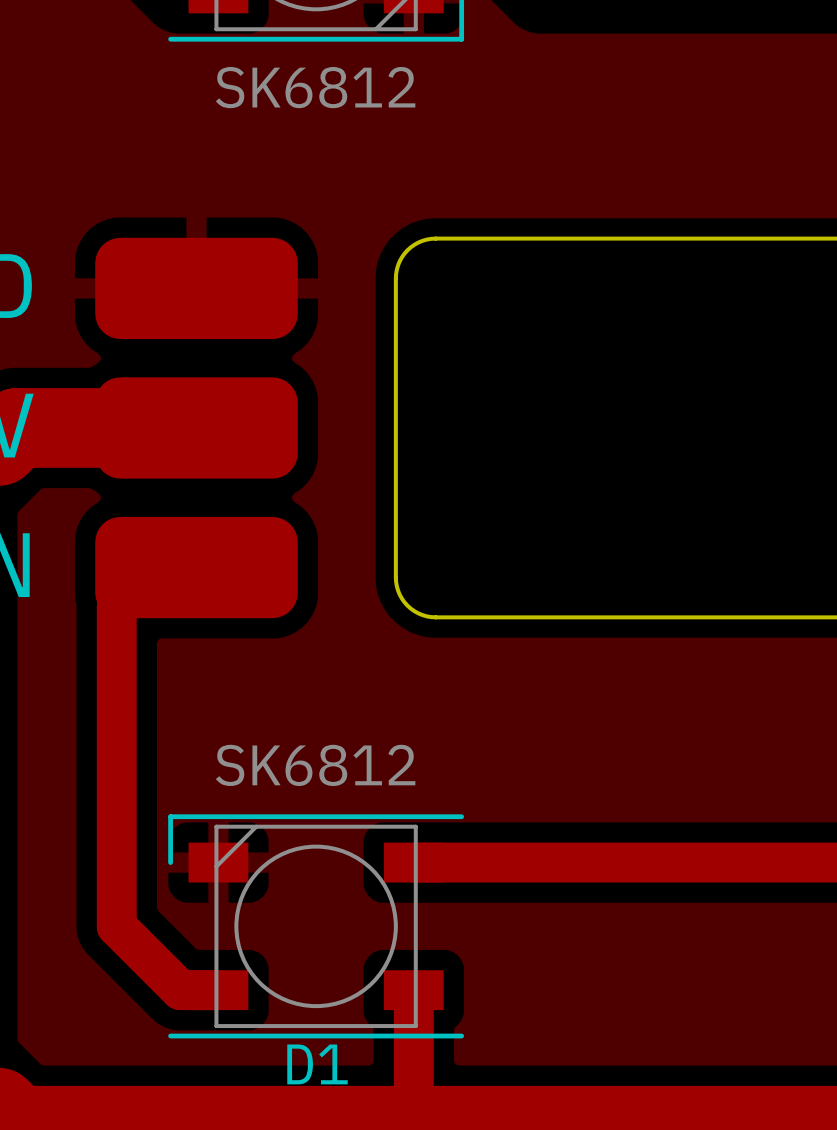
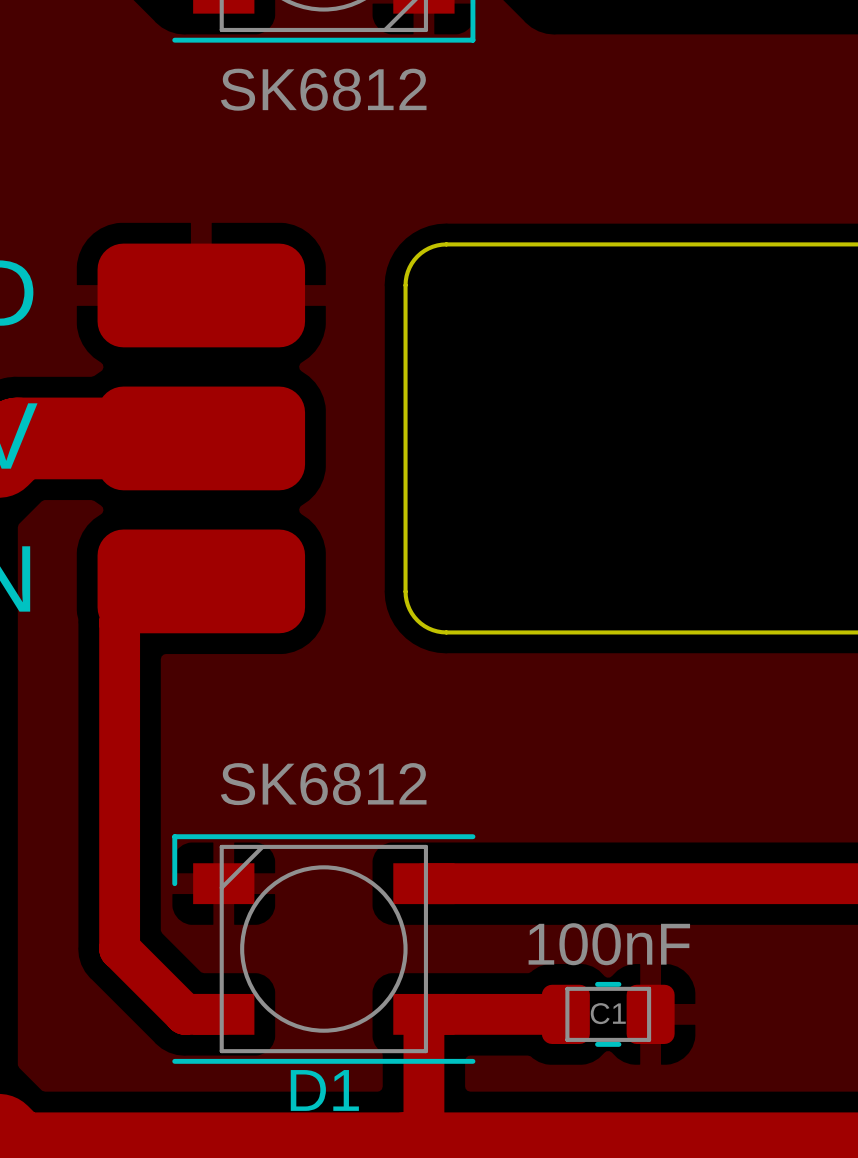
track: none -> (423, 1014) (565, 1014)
C1: none -> 100nF (608, 1014)

